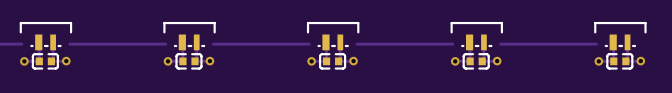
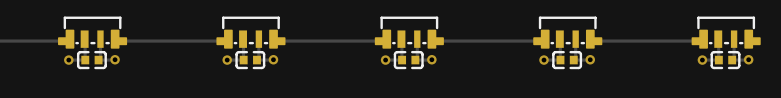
part footprint: [19, 21, 73, 51] -> [58, 16, 128, 49]
part footprint: [163, 21, 216, 51] -> [216, 16, 286, 49]
part footprint: [306, 21, 360, 51] -> [374, 16, 444, 49]
part footprint: [450, 21, 503, 51] -> [533, 16, 603, 49]
part footprint: [594, 21, 647, 51] -> [691, 16, 761, 49]

